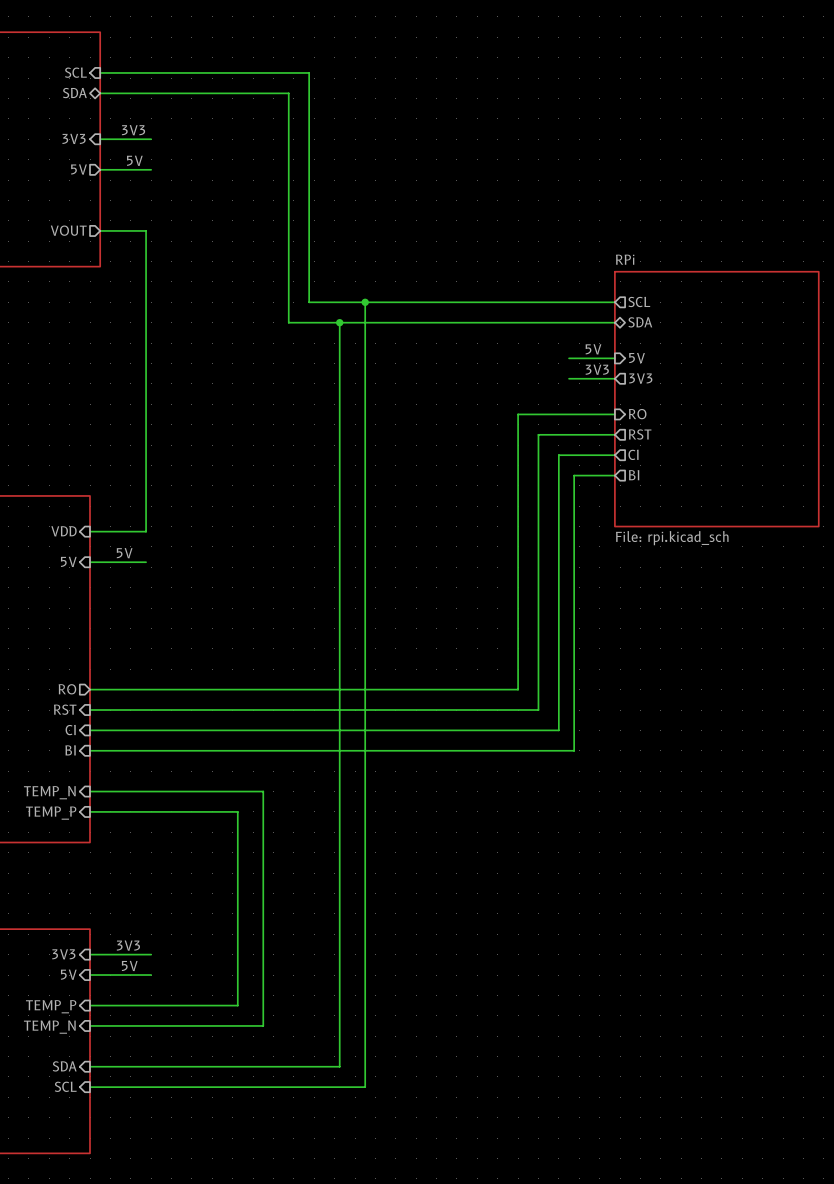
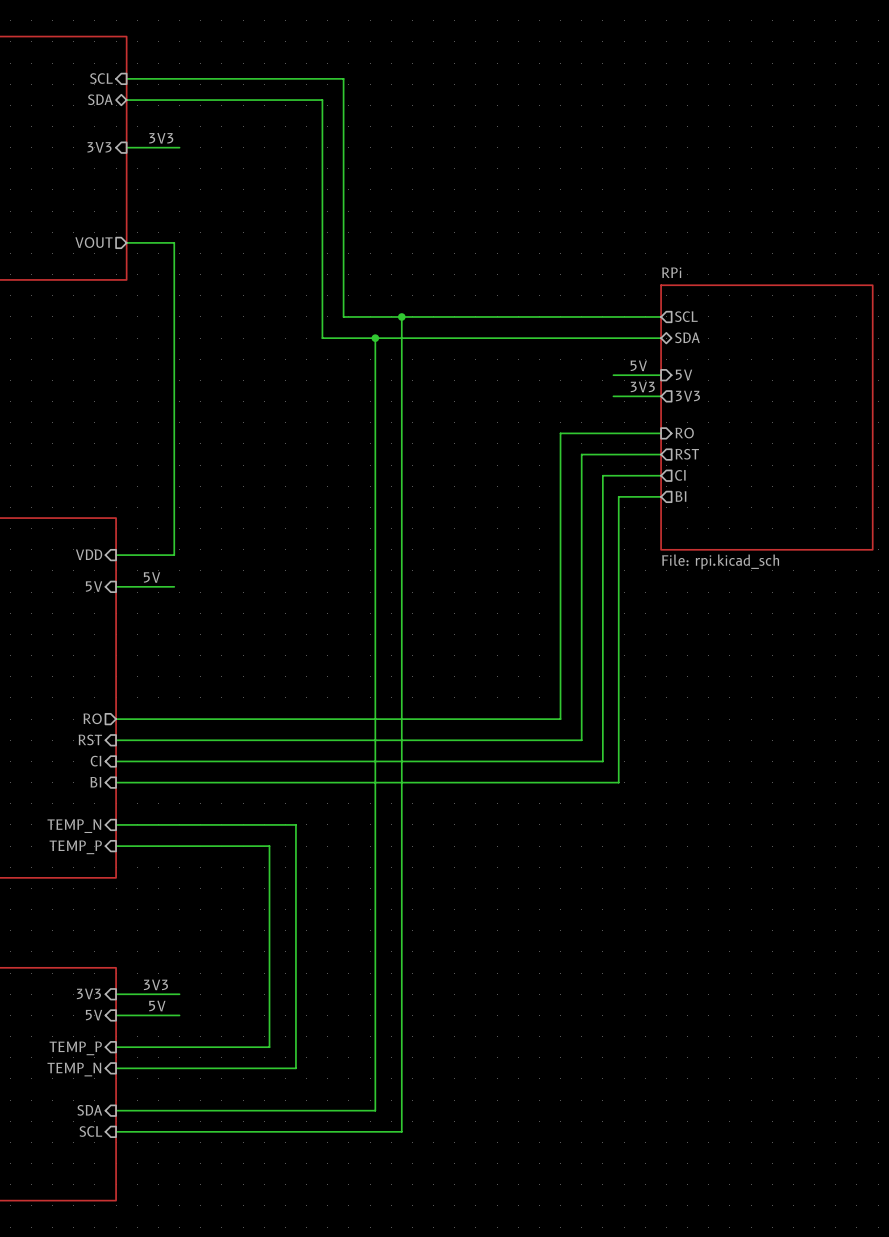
label: 5V (134, 160) -> none
sheet pin: 5V (79, 169) -> none
wire: (100, 169) (151, 169) -> none

